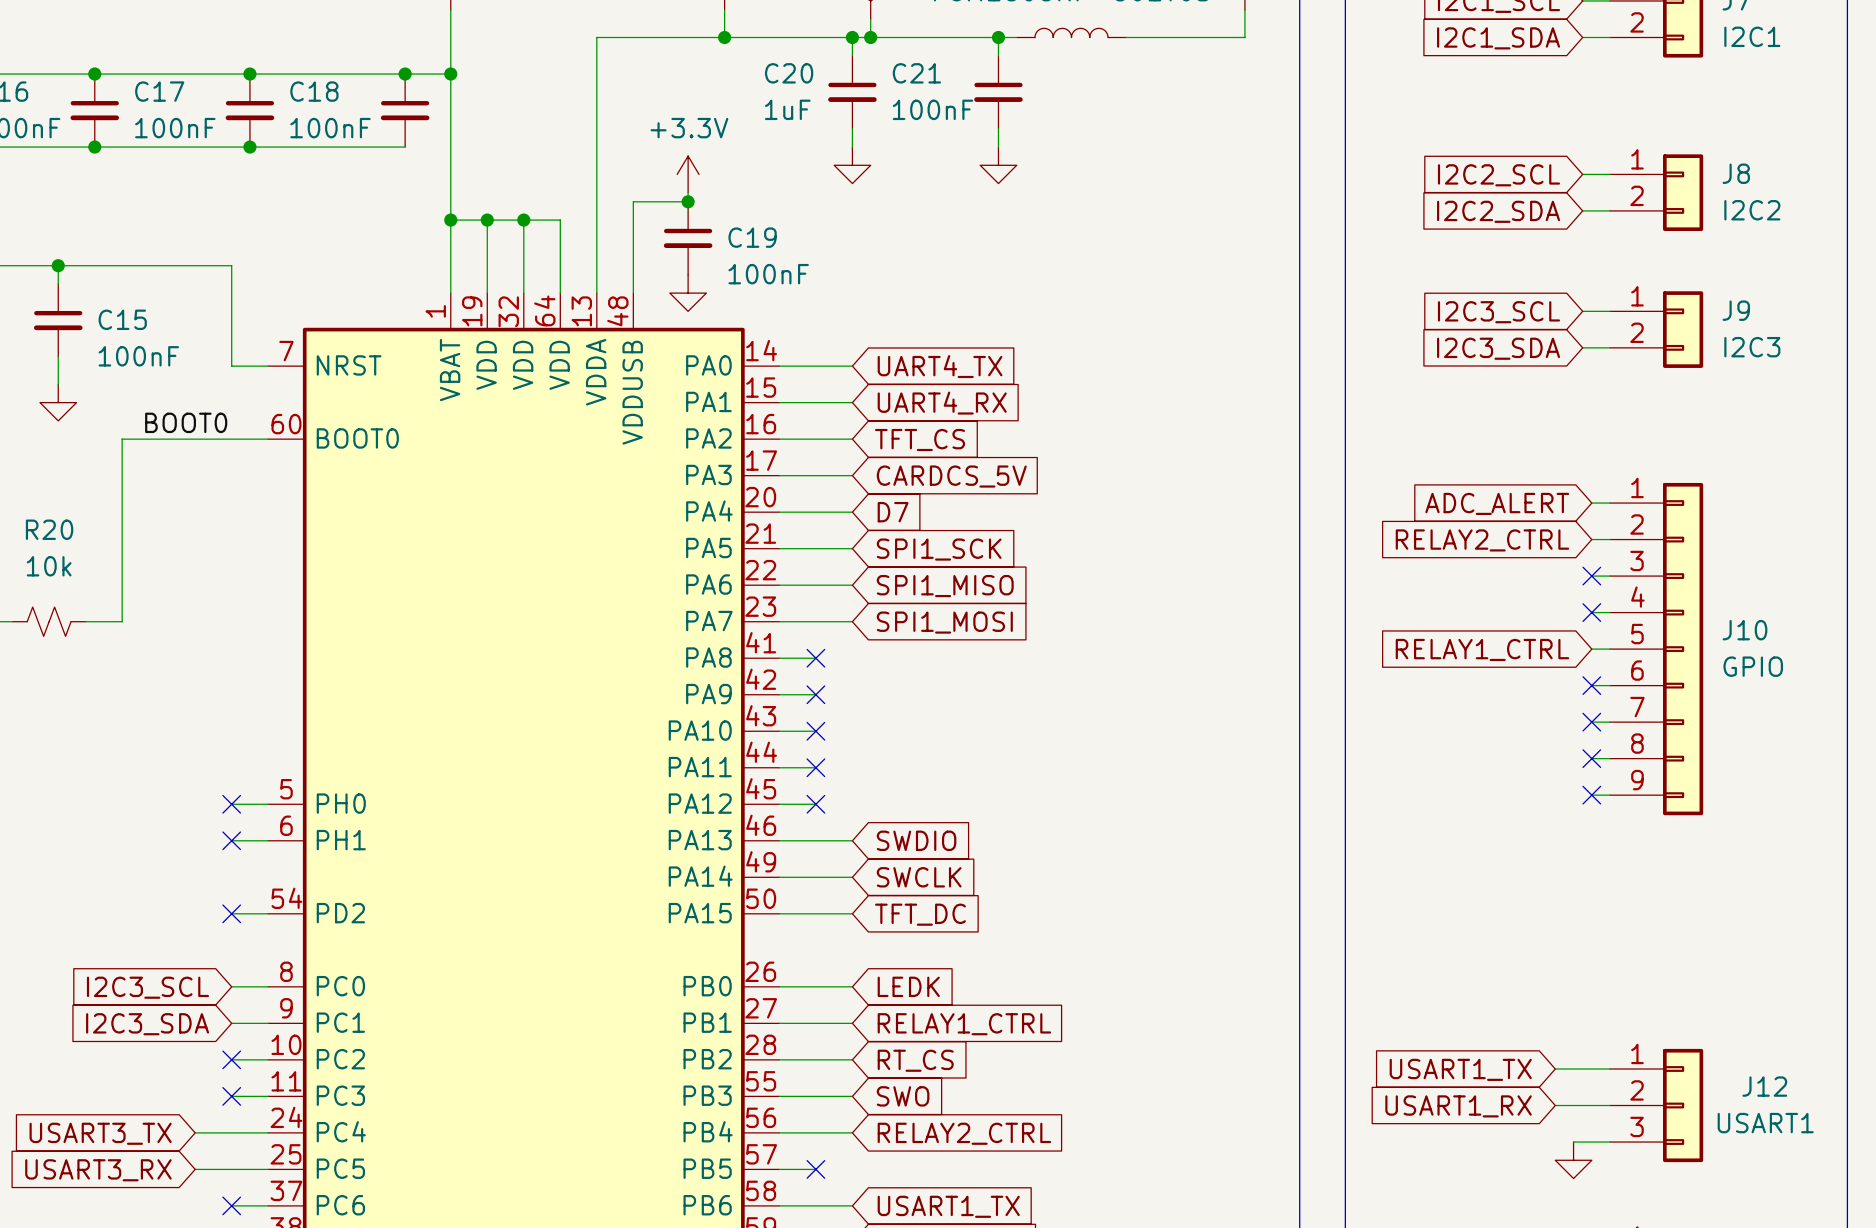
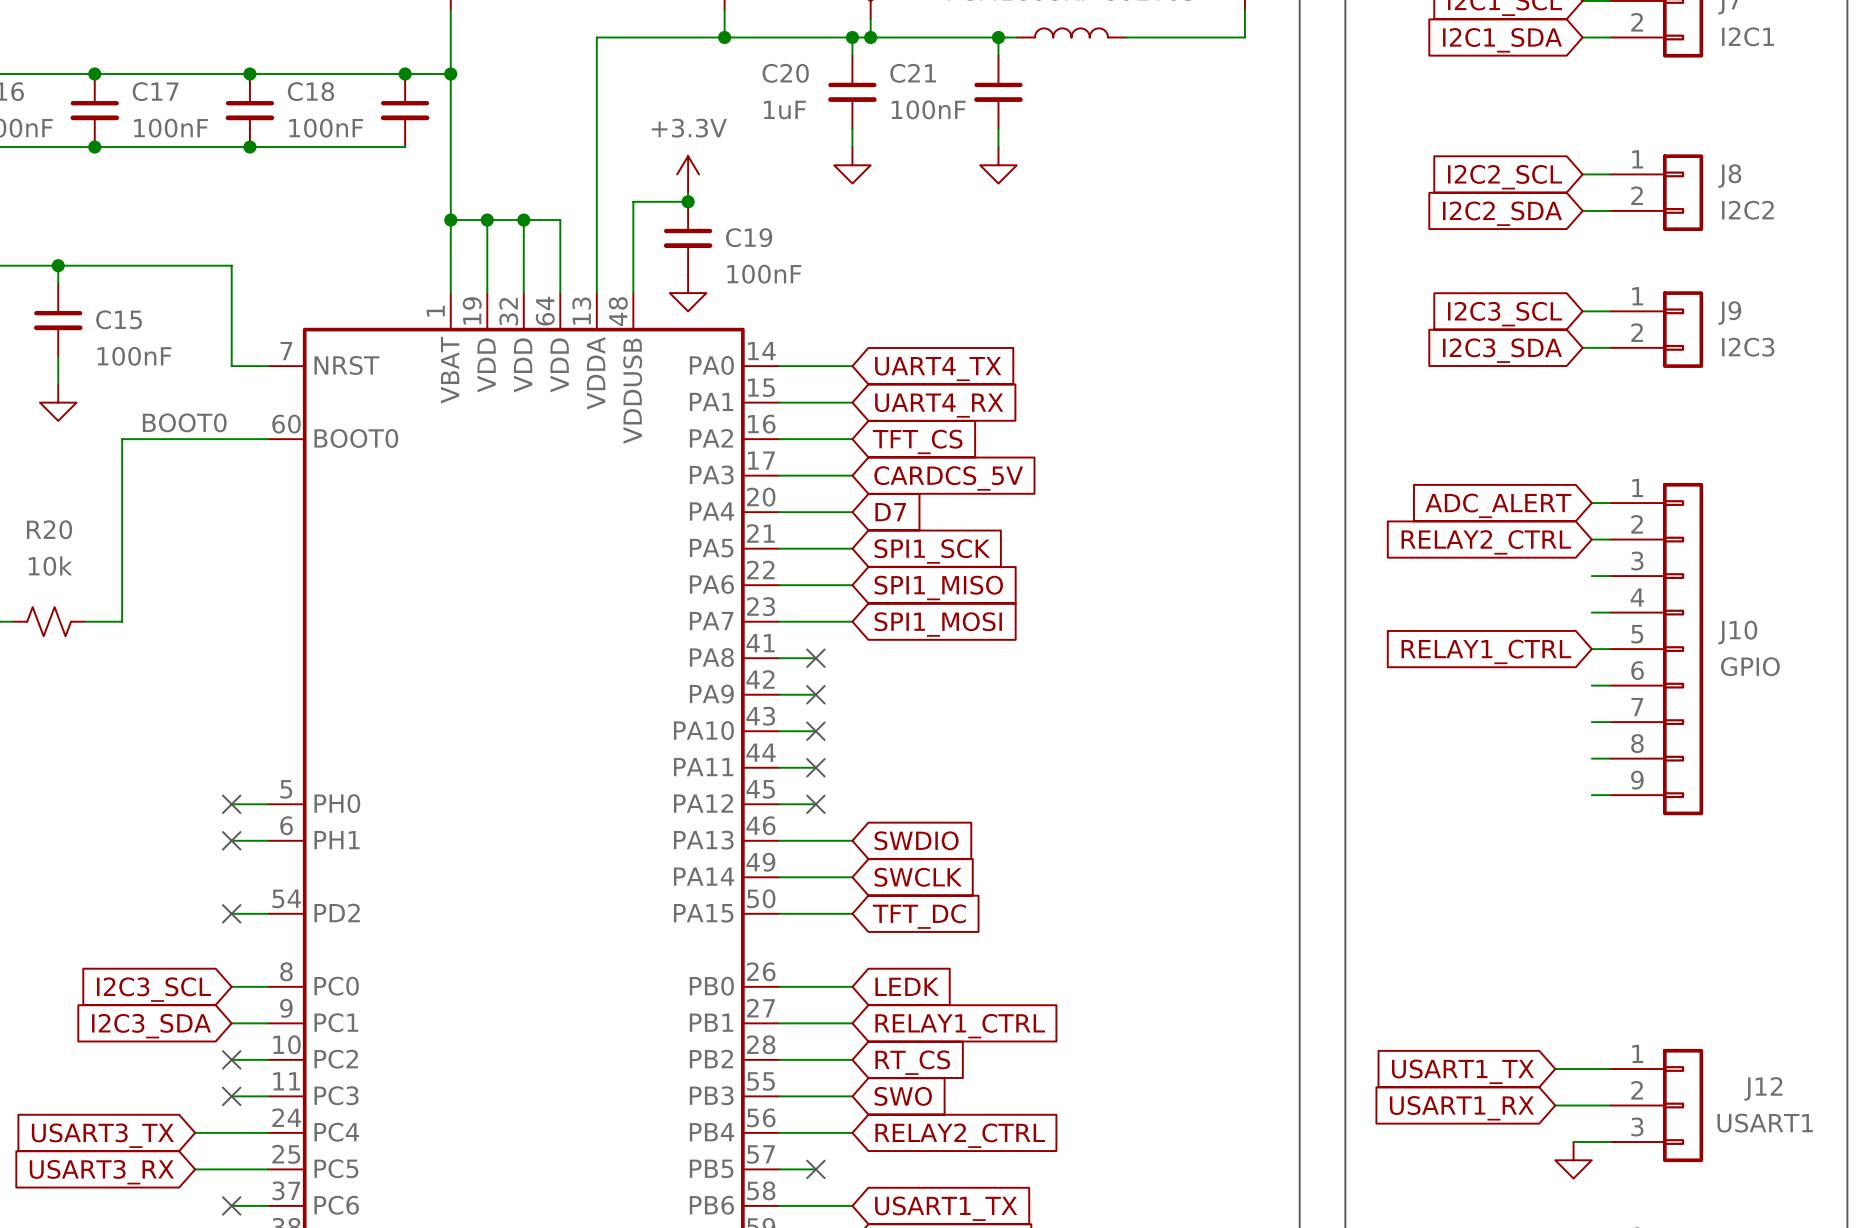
no-connect mark: (1591, 576) -> none
no-connect mark: (1591, 612) -> none
no-connect mark: (1591, 685) -> none
no-connect mark: (1591, 722) -> none
no-connect mark: (1591, 758) -> none
no-connect mark: (1591, 795) -> none

